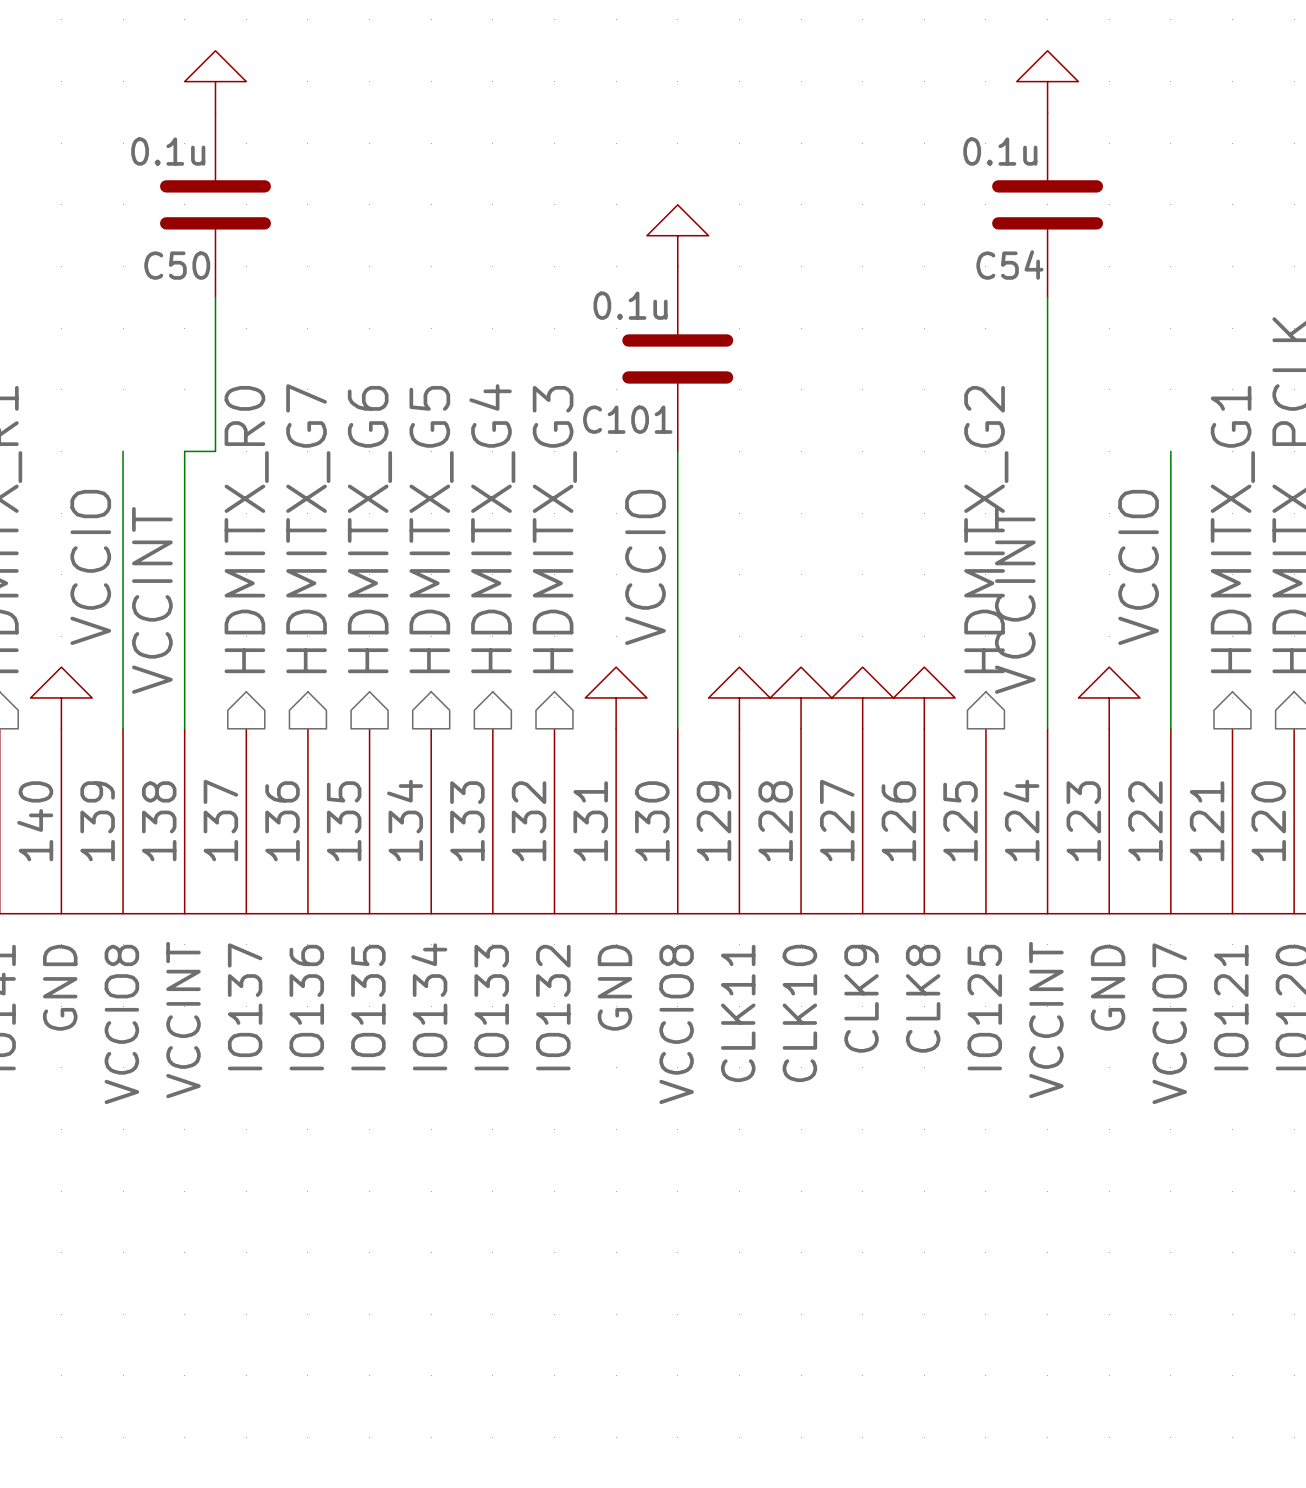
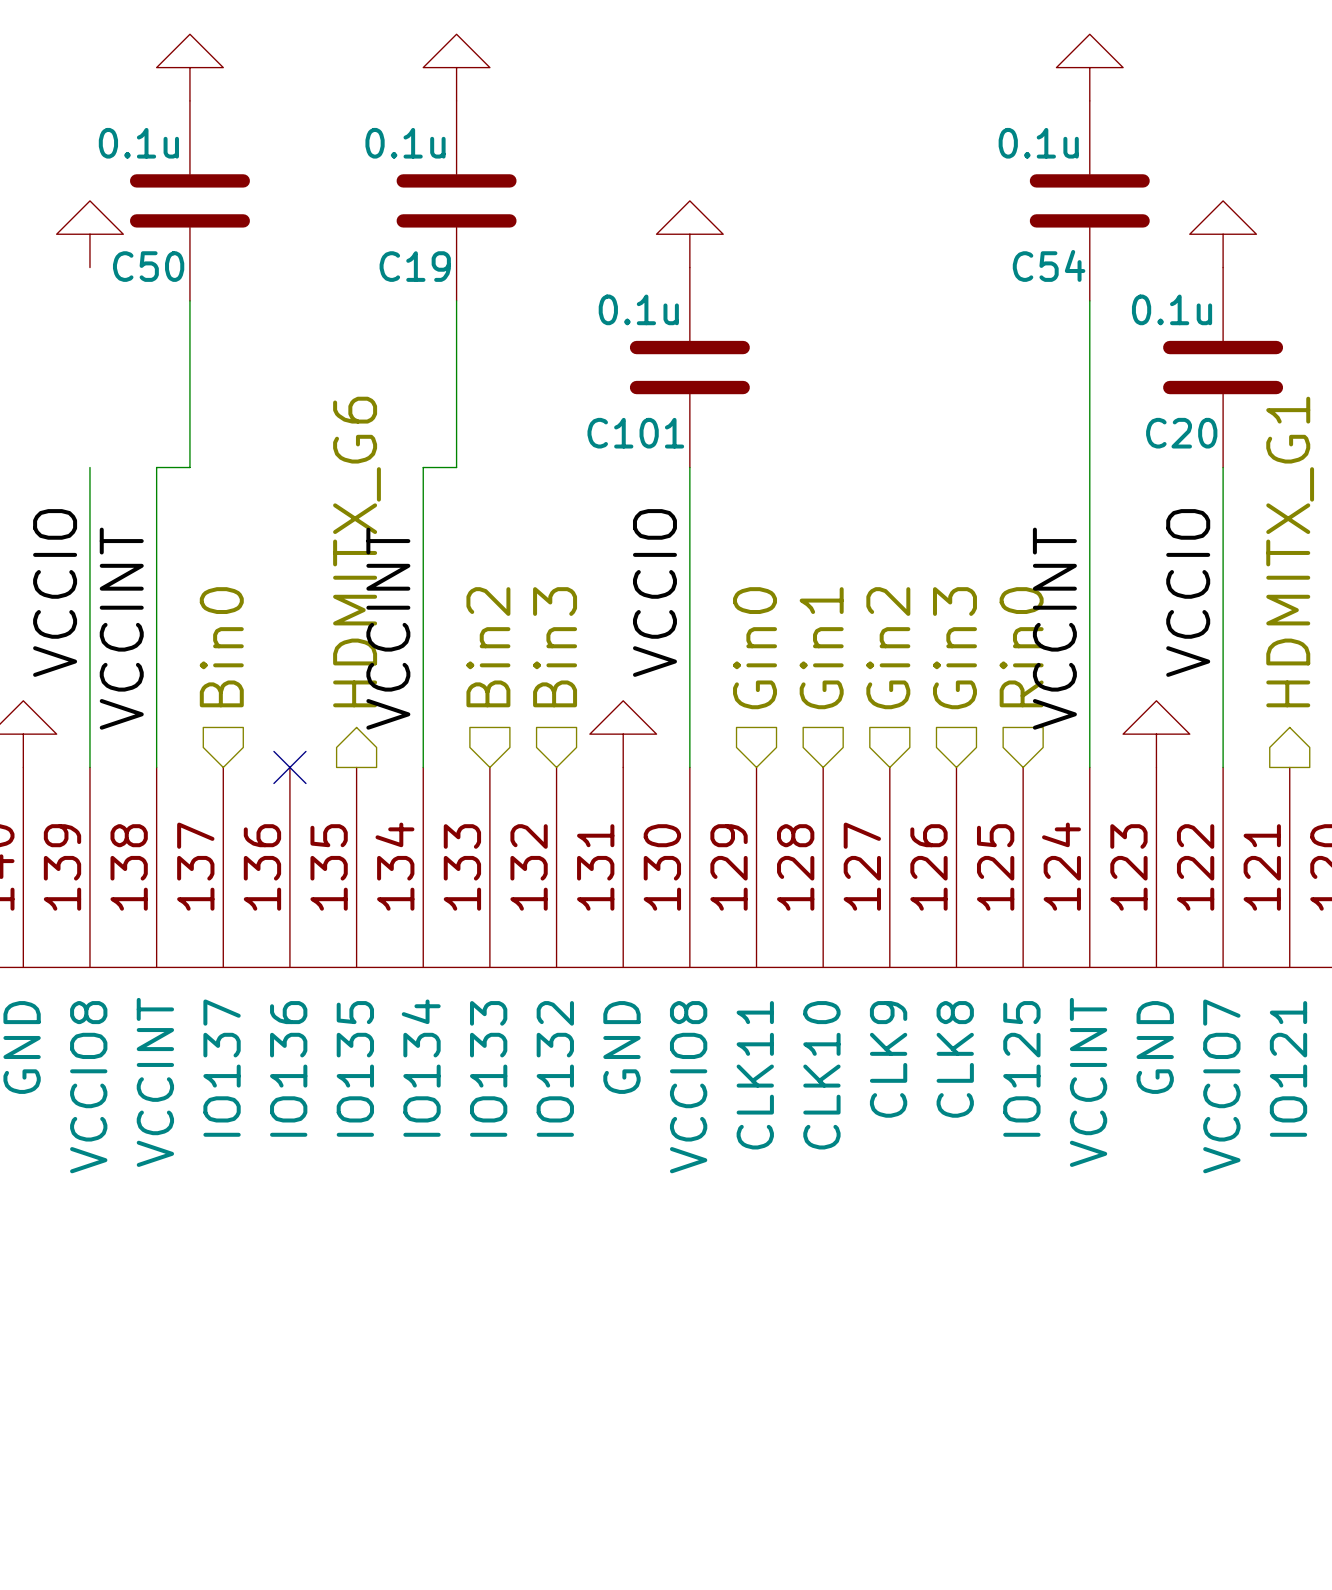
power symbol: none -> (456, 67)
C19: none -> 0.1u (456, 200)
power symbol: none -> (89, 234)
power symbol: none -> (1223, 234)
wire: none -> (456, 300) (456, 467) (423, 467) (423, 767)
C20: none -> 0.1u (1223, 367)
hierarchical label: HDMITX_G7 (308, 528) -> none
hierarchical label shape: output (492, 528) -> input (488, 647)
hierarchical label: HDMITX_G4 (492, 528) -> Bin2 (488, 647)
hierarchical label shape: output (246, 529) -> input (221, 647)
hierarchical label: HDMITX_R0 (246, 529) -> Bin0 (221, 647)
hierarchical label: HDMITX_G5 (431, 529) -> none
hierarchical label shape: output (554, 529) -> input (555, 647)
hierarchical label: HDMITX_G3 (554, 529) -> Bin3 (555, 647)
hierarchical label shape: output (986, 529) -> input (1021, 647)
hierarchical label: HDMITX_G2 (986, 529) -> Rin0 (1021, 647)
label: none -> VCCINT (388, 628)
hierarchical label: none -> Gin0 (755, 648)
hierarchical label: none -> Gin1 (821, 648)
hierarchical label: none -> Gin2 (888, 648)
hierarchical label: none -> Gin3 (954, 648)
power symbol: (739, 697) -> none
power symbol: (801, 697) -> none
power symbol: (862, 697) -> none
power symbol: (924, 697) -> none
no-connect mark: none -> (289, 767)

